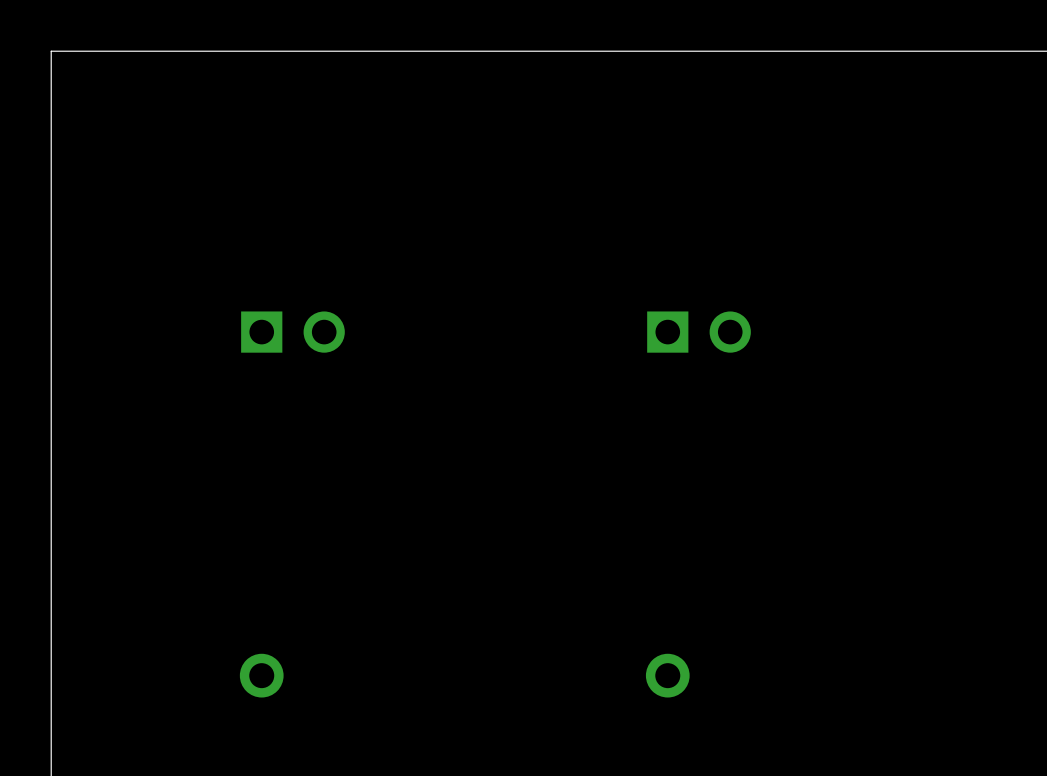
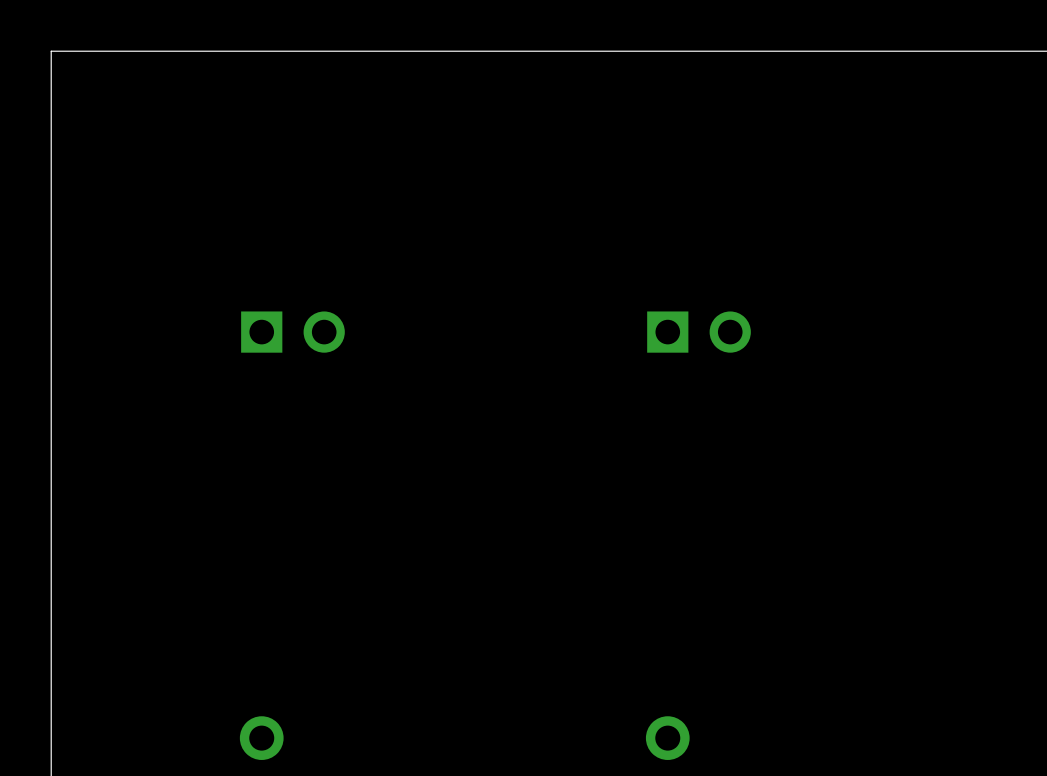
part position: (261, 675) -> (261, 738)
part position: (667, 675) -> (667, 738)

